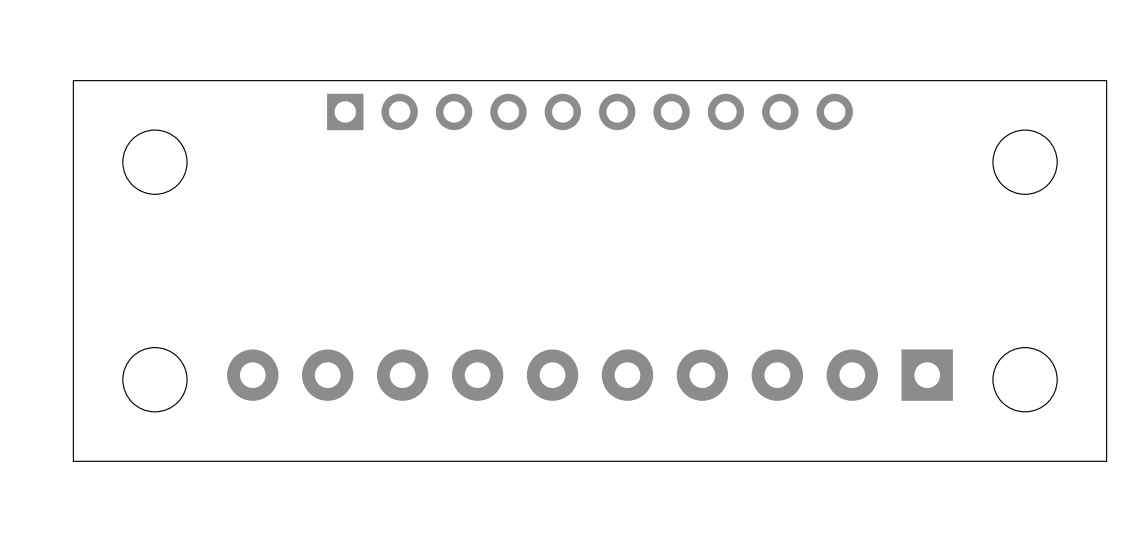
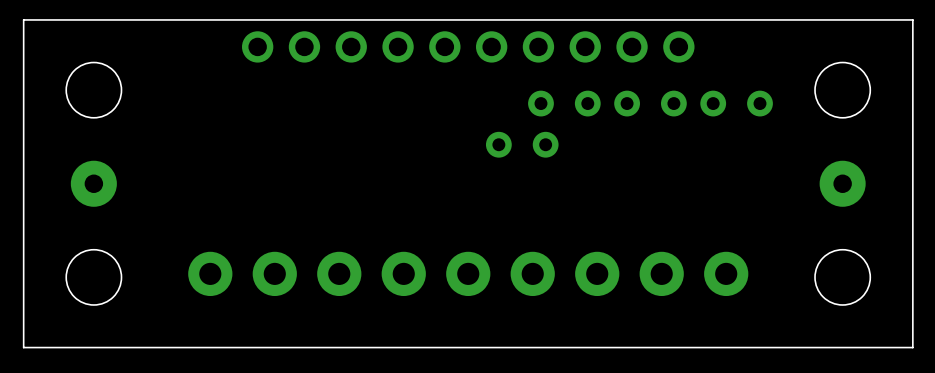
part footprint: [327, 93, 853, 131] -> [242, 31, 695, 63]
part: none -> (564, 103)
part: none -> (650, 103)
part: none -> (736, 103)
part: none -> (522, 144)
part: none -> (93, 183)
part: none -> (842, 183)
part footprint: [227, 349, 953, 401] -> [188, 251, 749, 297]

